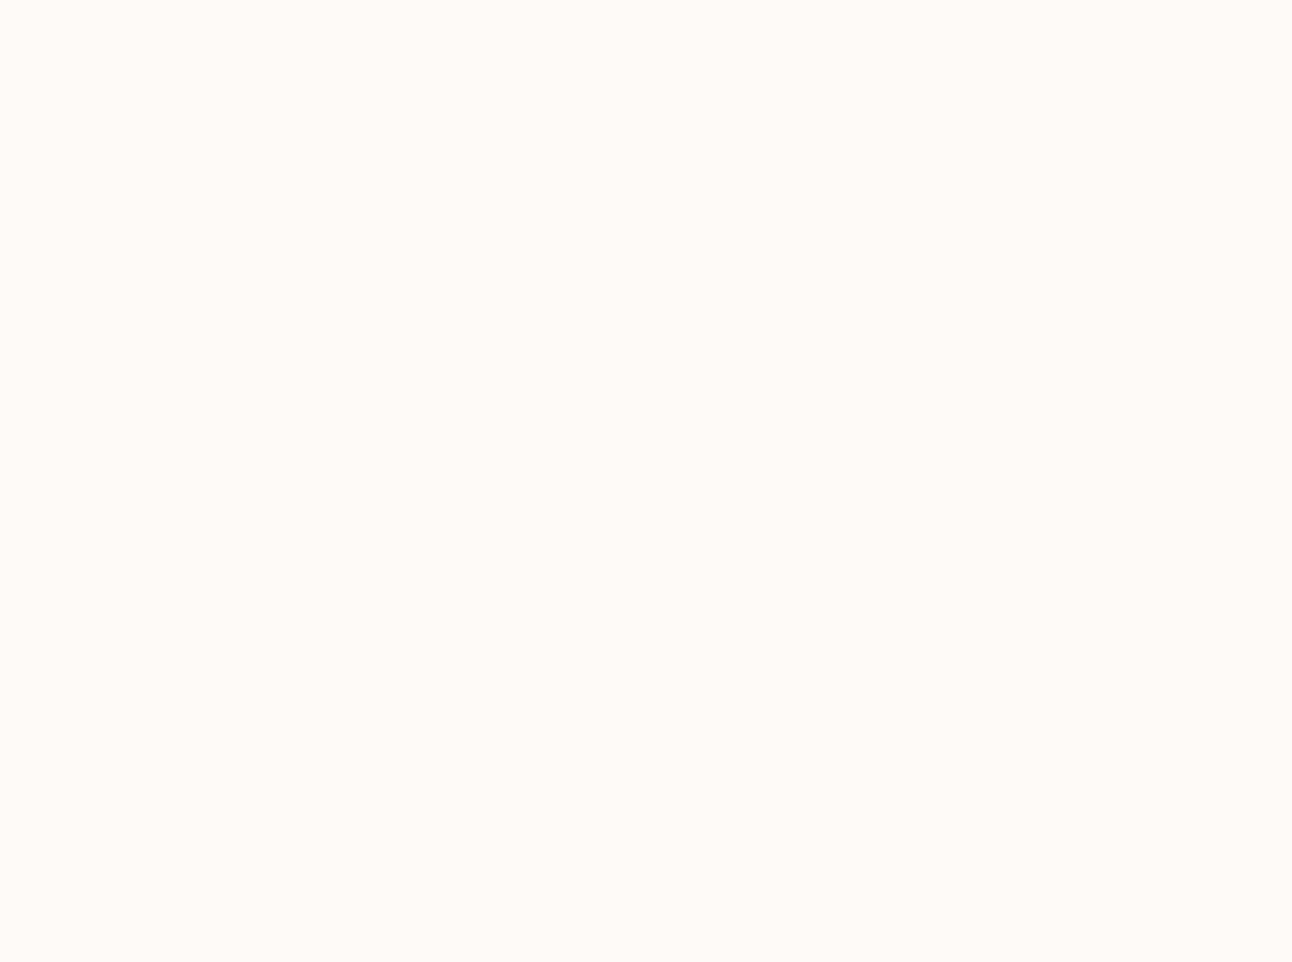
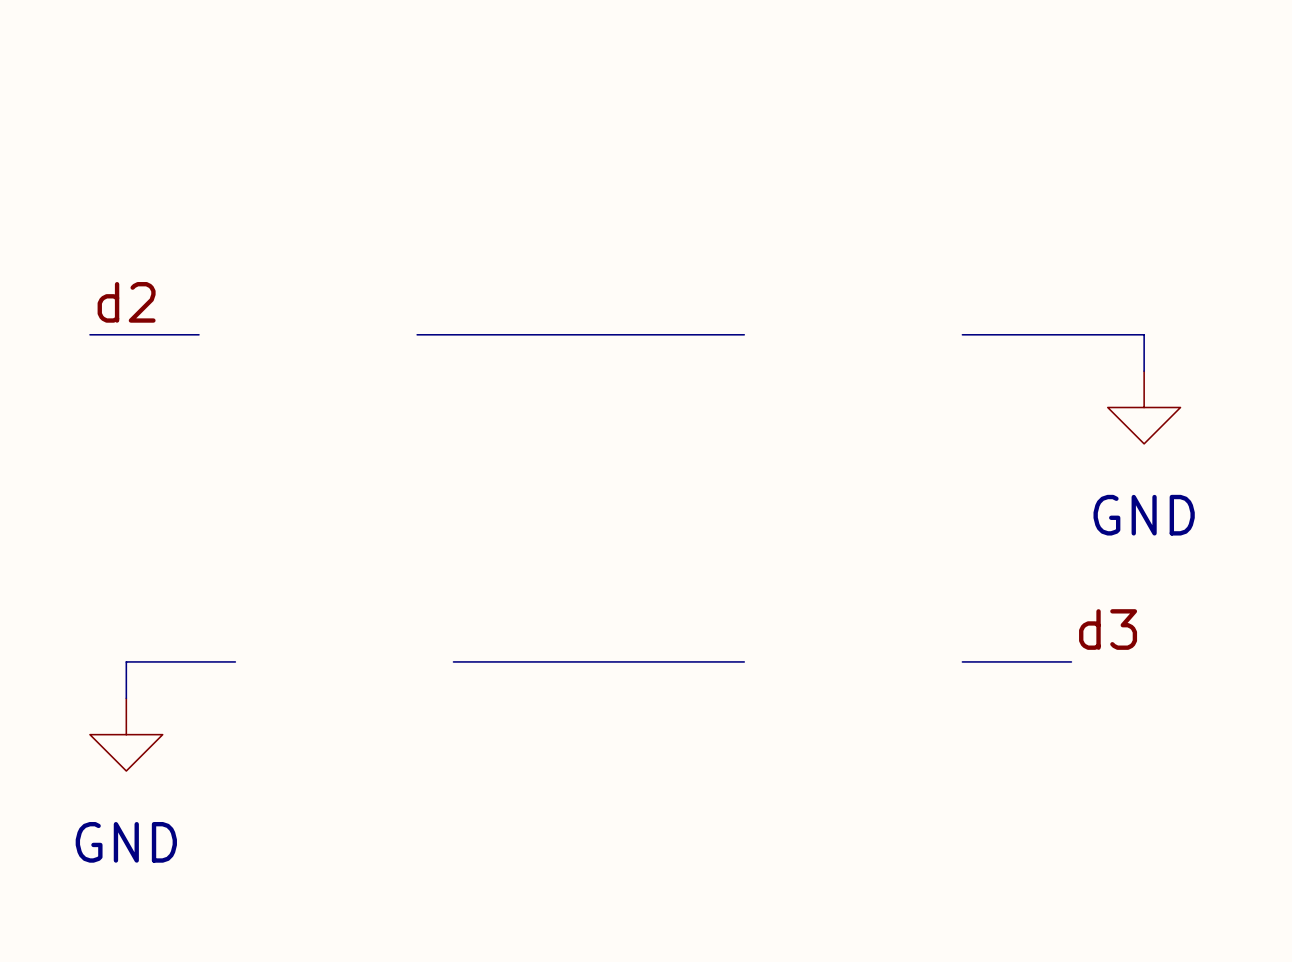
label: none -> d2 (126, 302)
wire: none -> (89, 334) (199, 334)
wire: none -> (417, 334) (744, 334)
wire: none -> (962, 334) (1144, 334) (1144, 371)
power symbol: none -> GND (1144, 407)
label: none -> d3 (1108, 629)
wire: none -> (235, 661) (126, 661) (126, 698)
wire: none -> (453, 661) (744, 661)
wire: none -> (962, 661) (1071, 661)
power symbol: none -> GND (126, 734)

